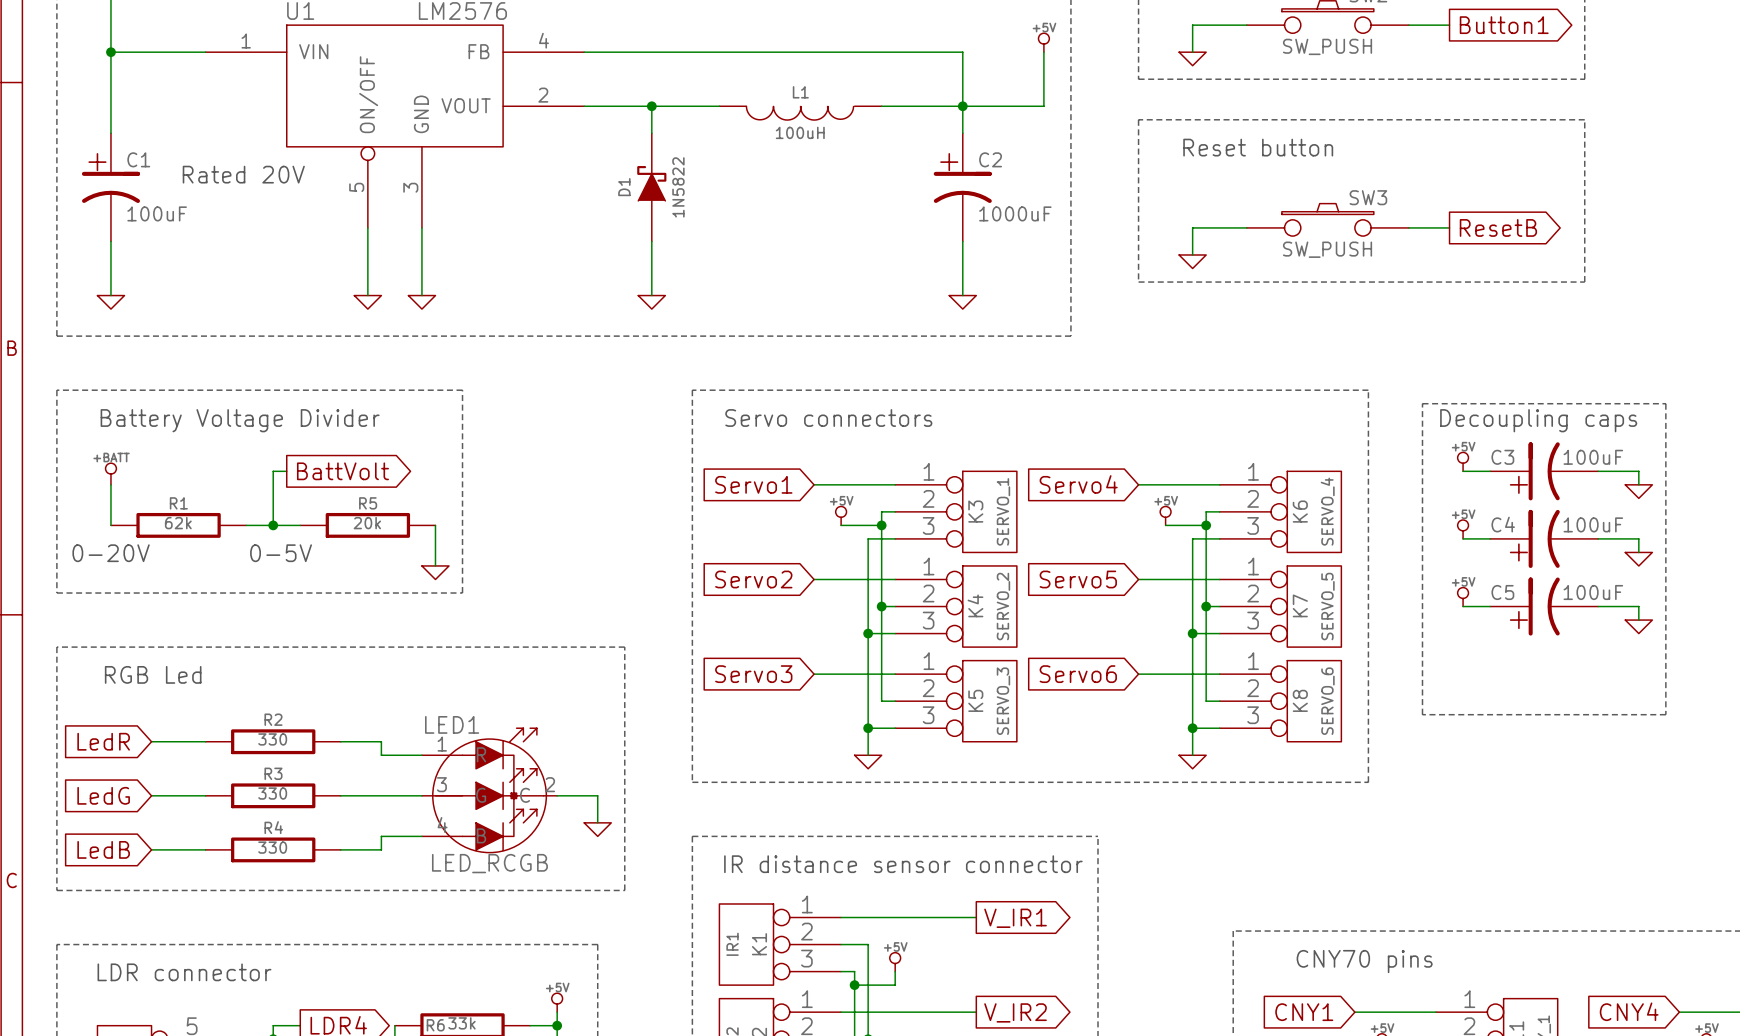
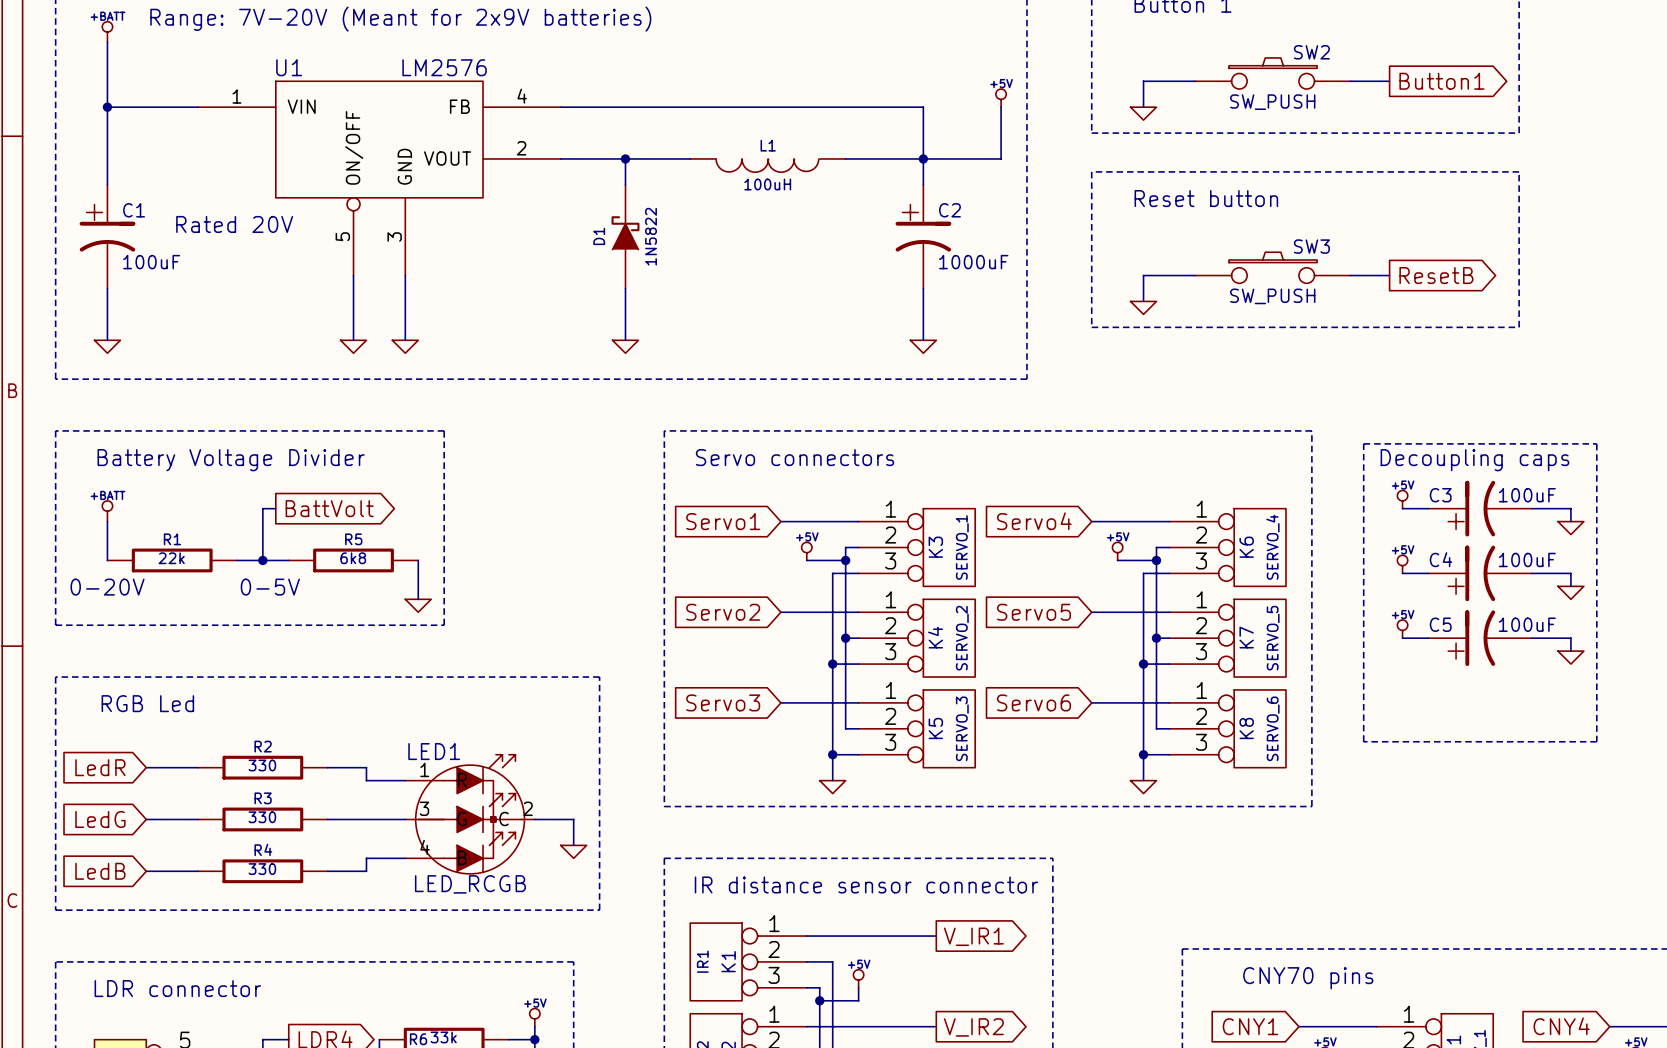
R1 value: 62k (178, 523) -> 22k (171, 558)
R5 value: 20k (367, 523) -> 6k8 (353, 558)

